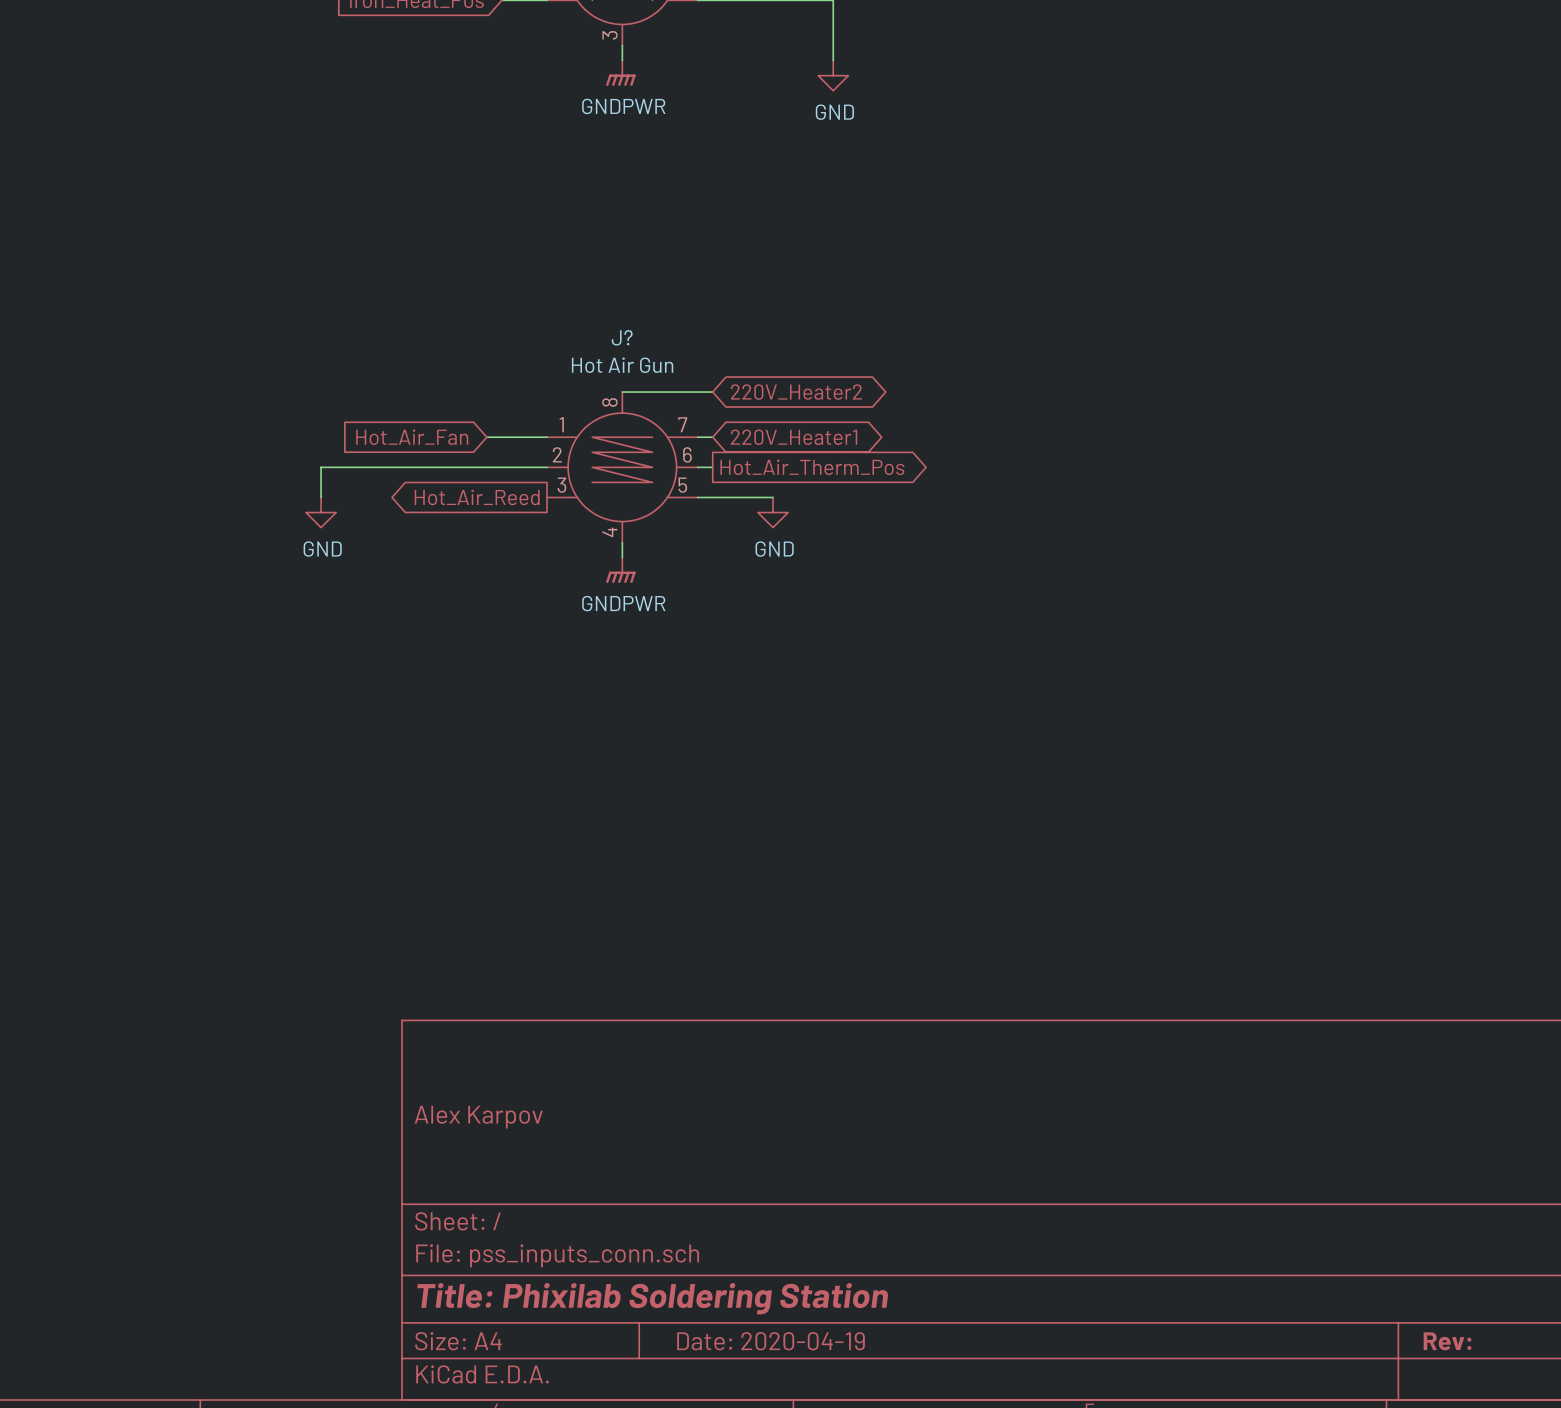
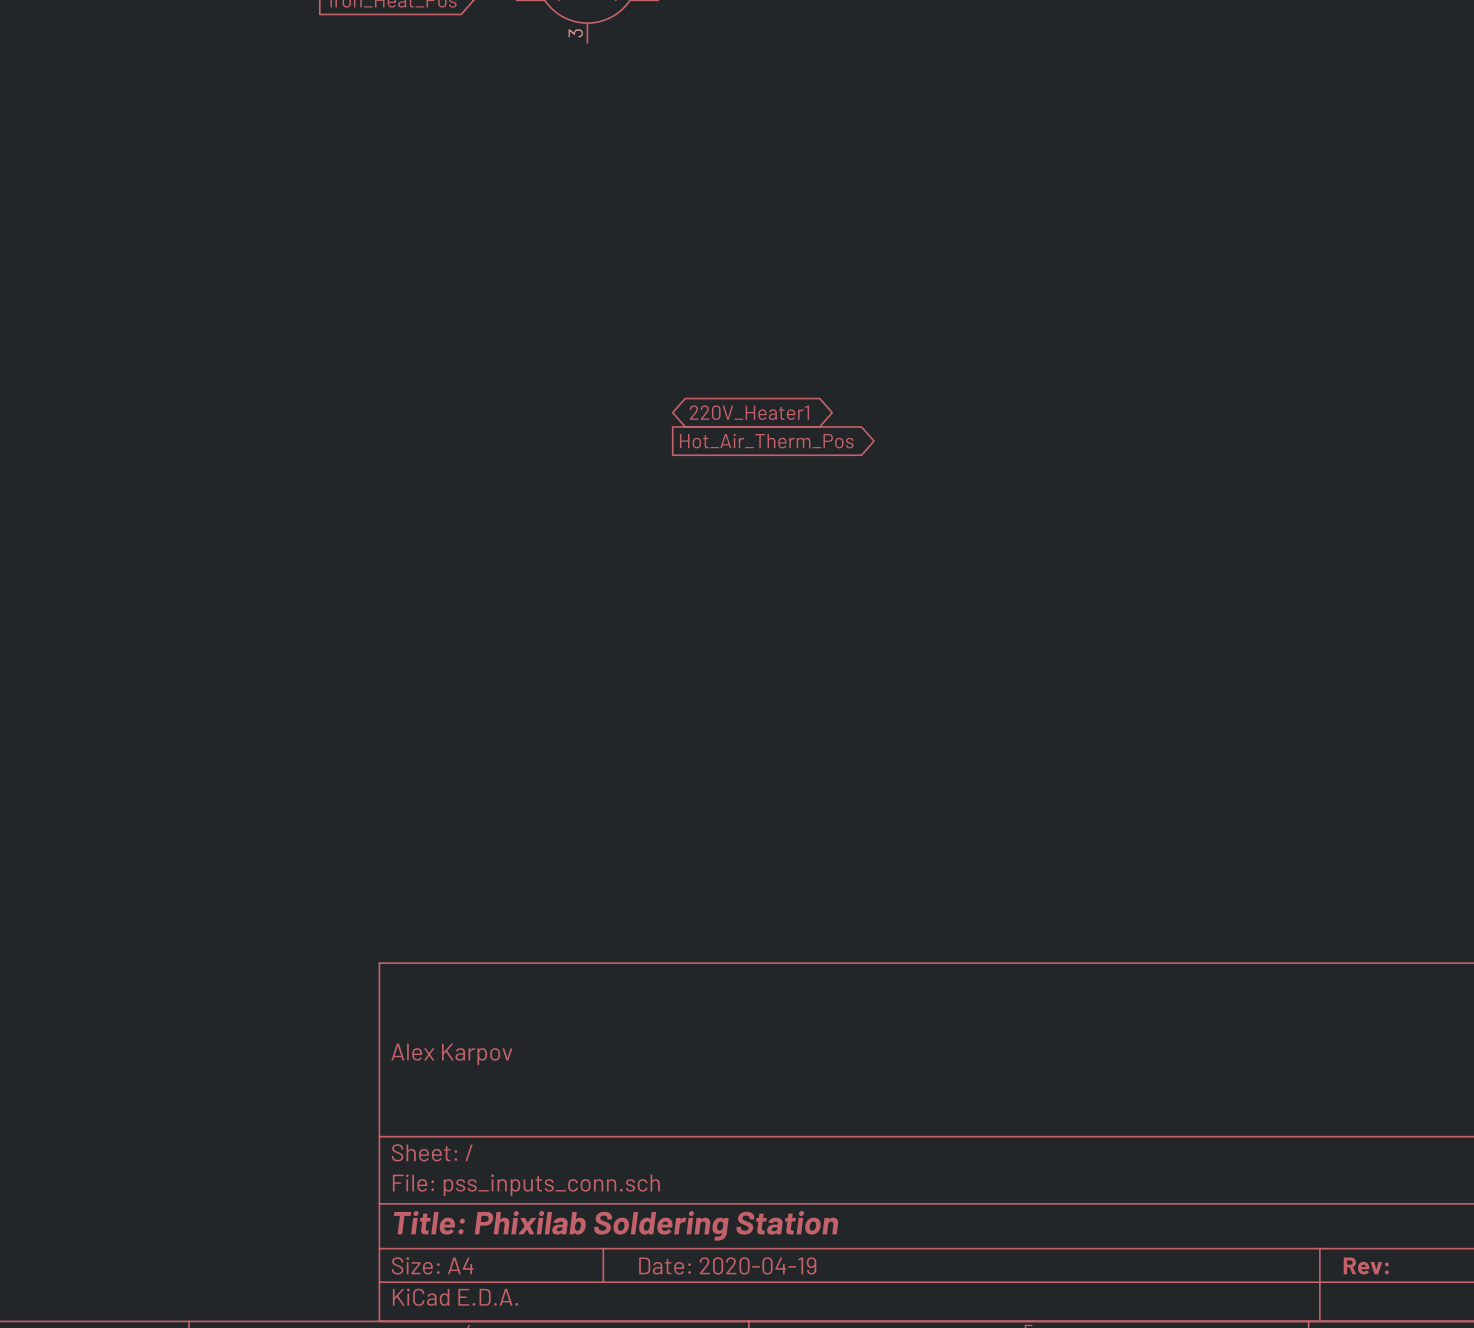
wire: (501, 0) (547, 0) -> none
wire: (697, 0) (833, 0) (833, 60) -> none
wire: (622, 45) (622, 60) -> none
power symbol: GNDPWR (620, 73) -> none
power symbol: GND (833, 75) -> none
wire: (622, 392) (712, 392) -> none
global label: 220V_Heater2 (796, 392) -> none
global label: Hot_Air_Fan (412, 437) -> none
wire: (486, 437) (547, 437) -> none
wire: (697, 437) (712, 437) -> none
wire: (547, 467) (321, 467) (321, 497) -> none
J?: Hot Air Gun (622, 467) -> none
wire: (697, 467) (712, 467) -> none
global label: Hot_Air_Reed (477, 497) -> none
wire: (697, 497) (773, 497) -> none
power symbol: GND (321, 512) -> none
power symbol: GND (773, 512) -> none
wire: (622, 542) (622, 557) -> none
power symbol: GNDPWR (620, 570) -> none

